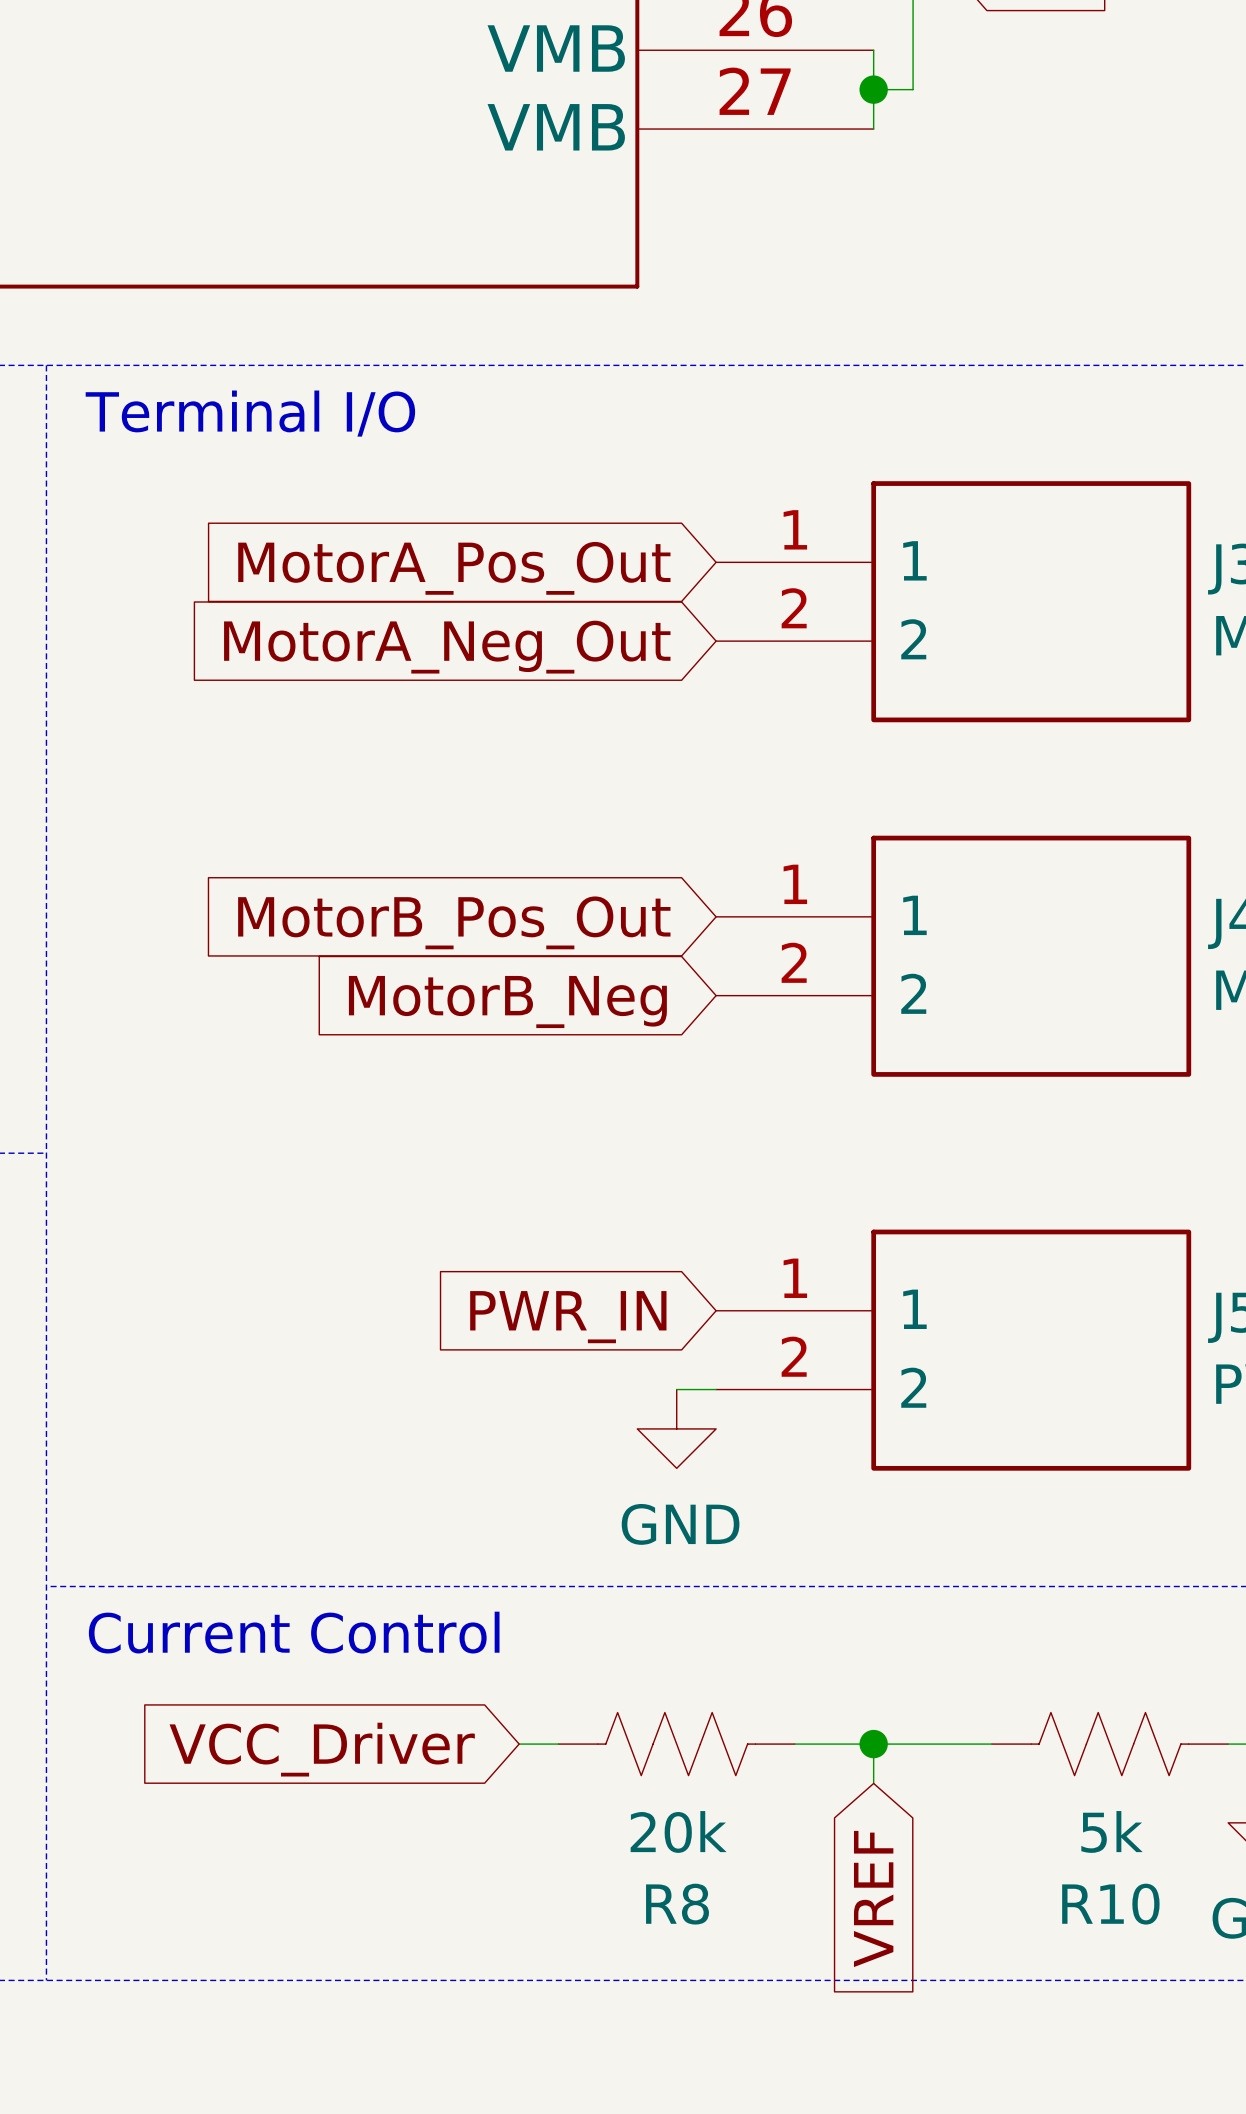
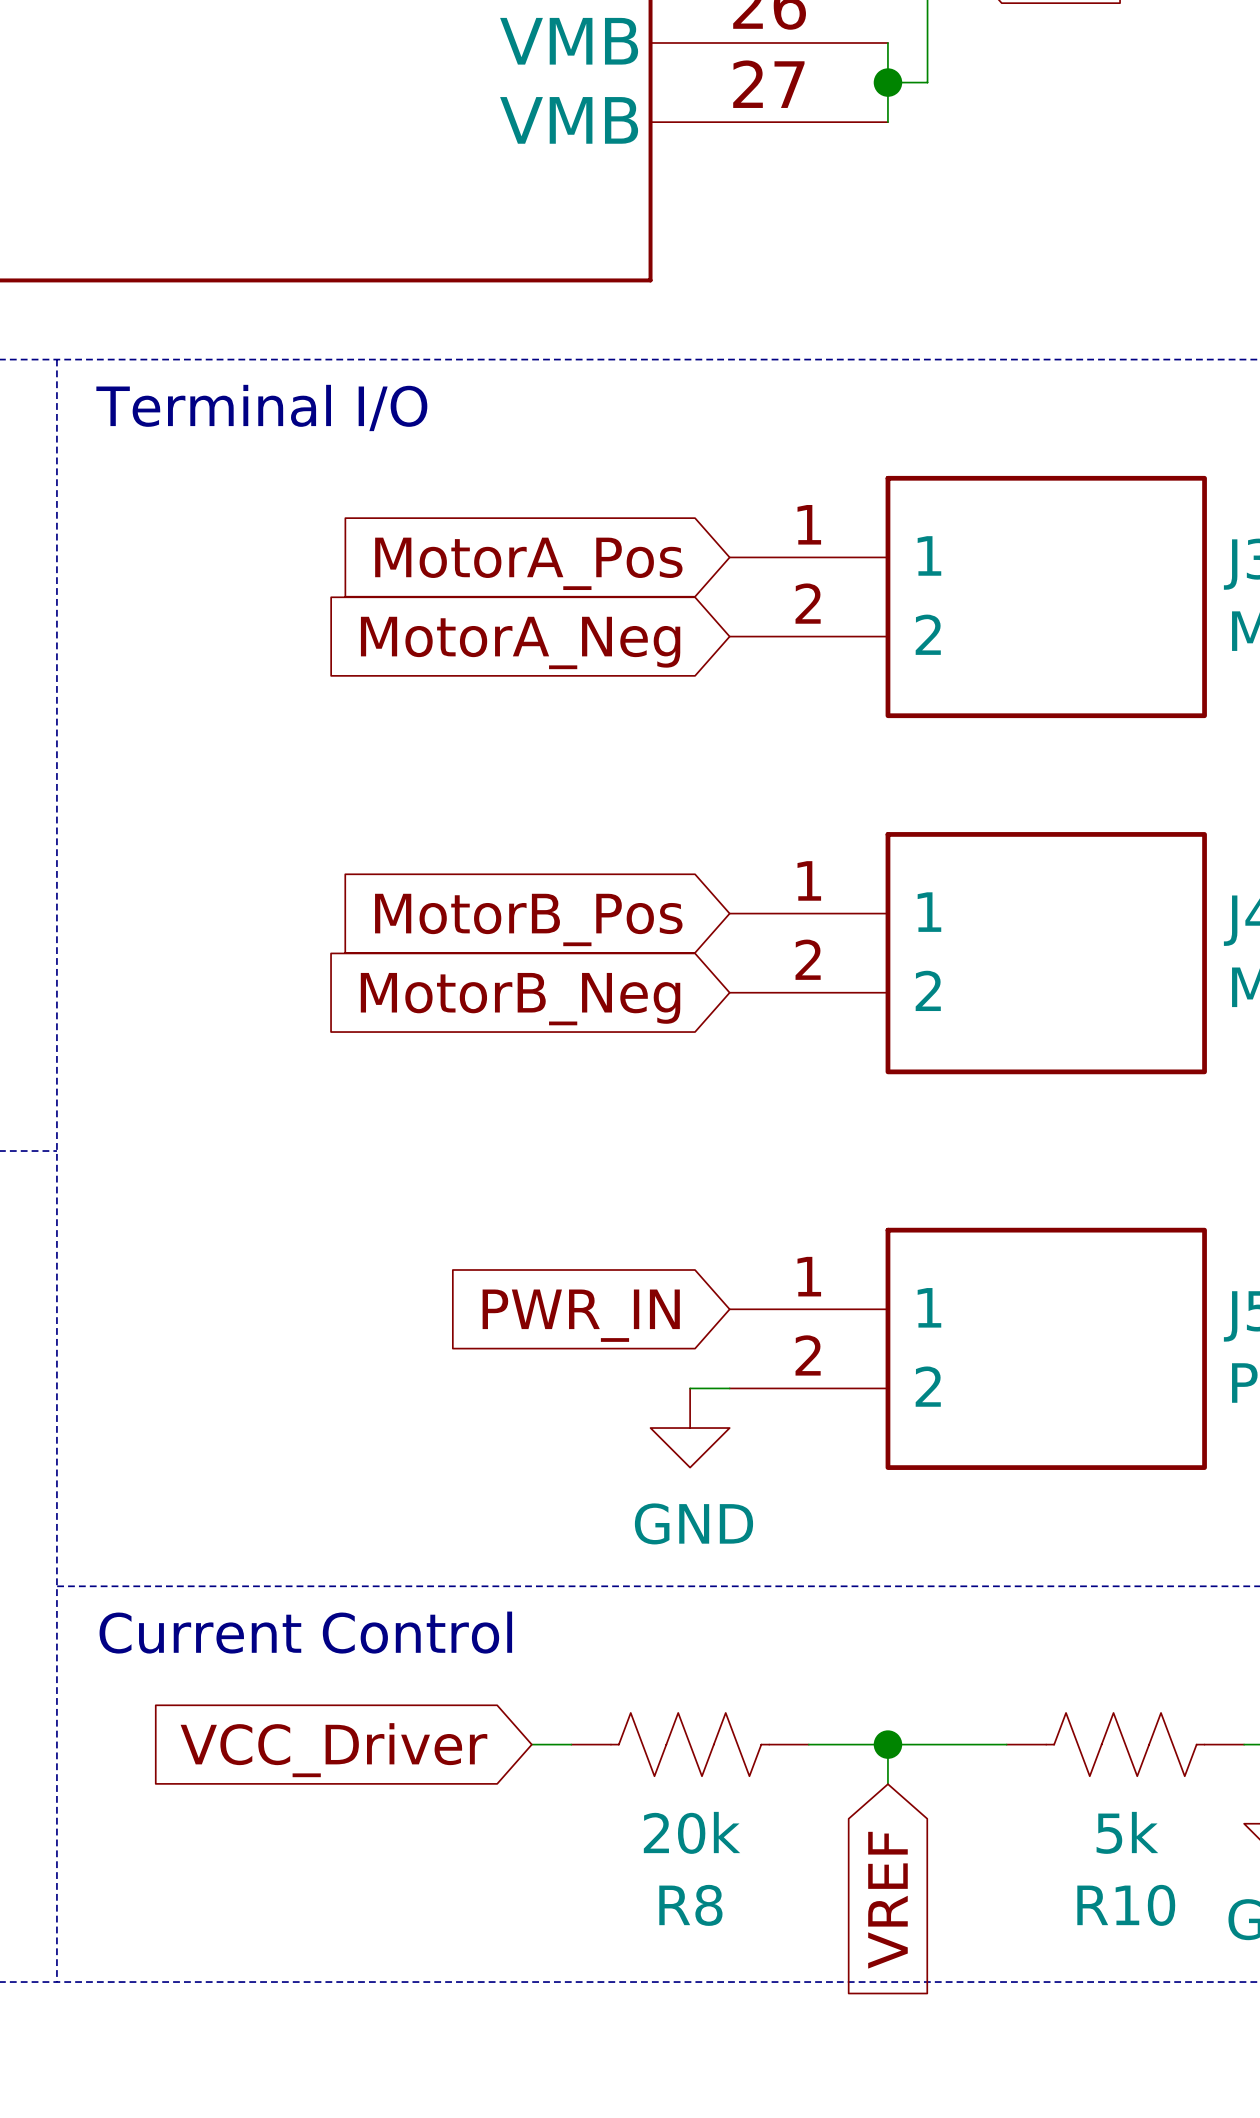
global label: MotorA_Pos_Out (454, 568) -> MotorA_Pos (528, 563)
global label: MotorA_Neg_Out (447, 647) -> MotorA_Neg (520, 642)
global label: MotorB_Pos_Out (454, 922) -> MotorB_Pos (528, 919)

